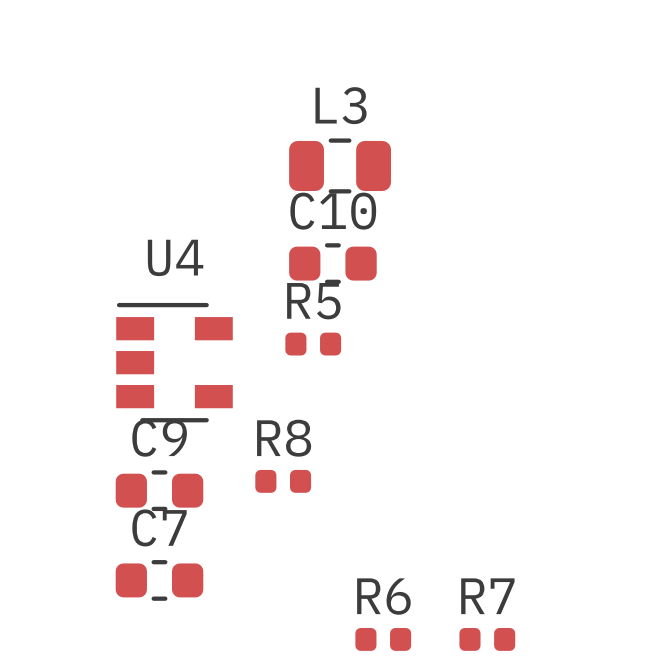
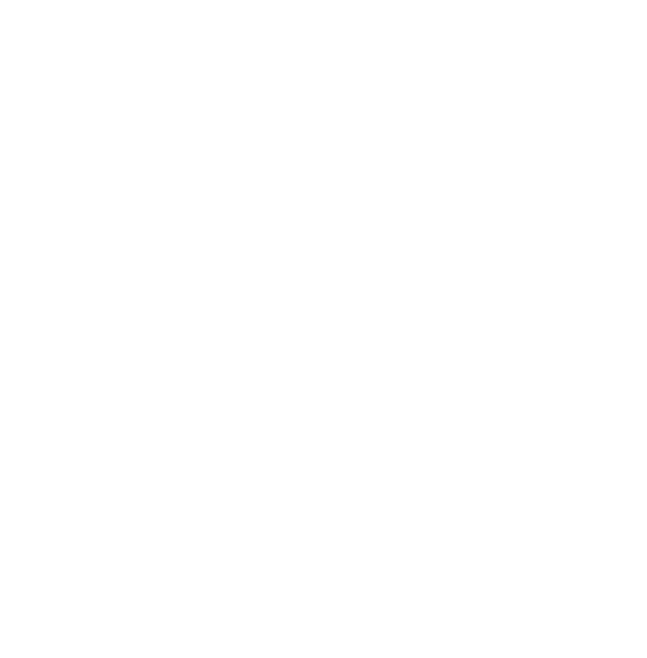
L3: (340, 165) -> none
C10: (332, 263) -> none
R5: (313, 344) -> none
U4: (174, 362) -> none
R8: (283, 481) -> none
C9: (159, 490) -> none
C7: (159, 580) -> none
R6: (383, 639) -> none
R7: (487, 639) -> none

